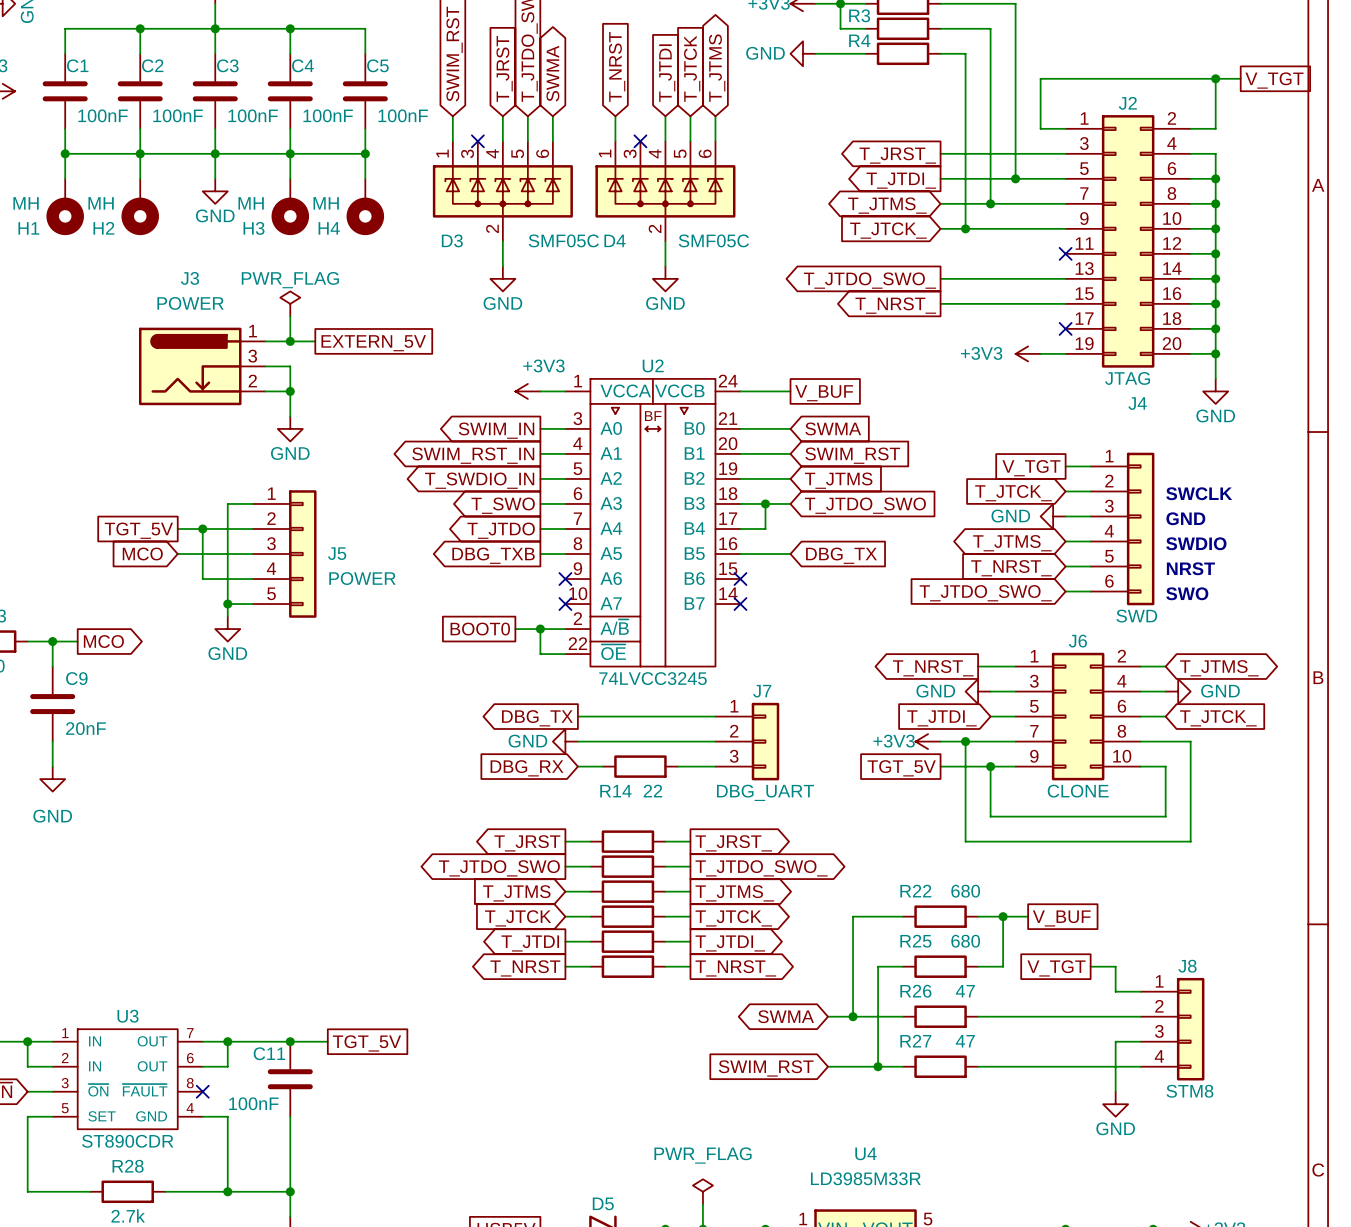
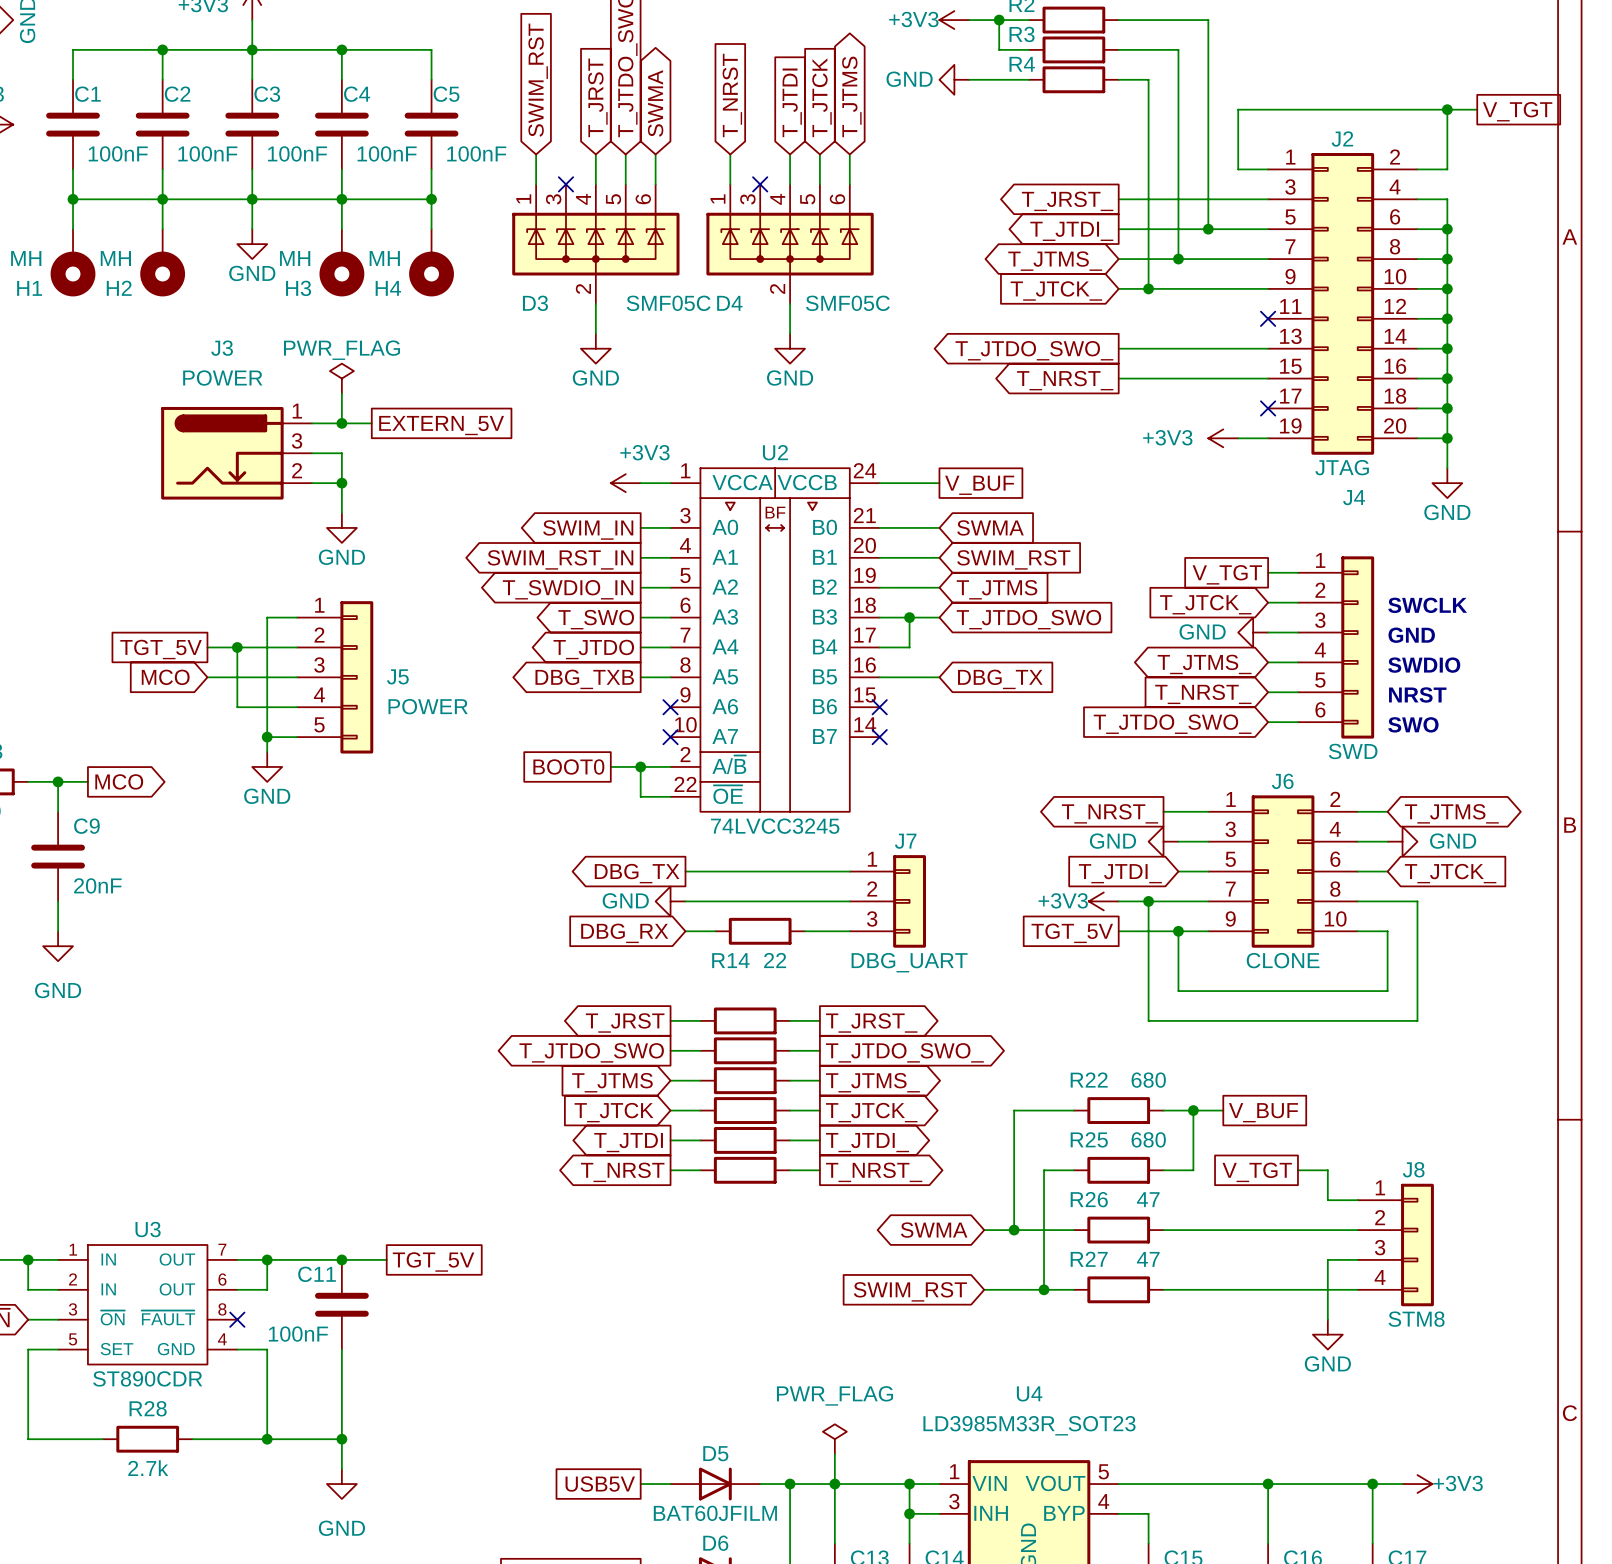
U4 value: LD3985M33R (865, 1178) -> LD3985M33R_SOT23 (1029, 1425)

